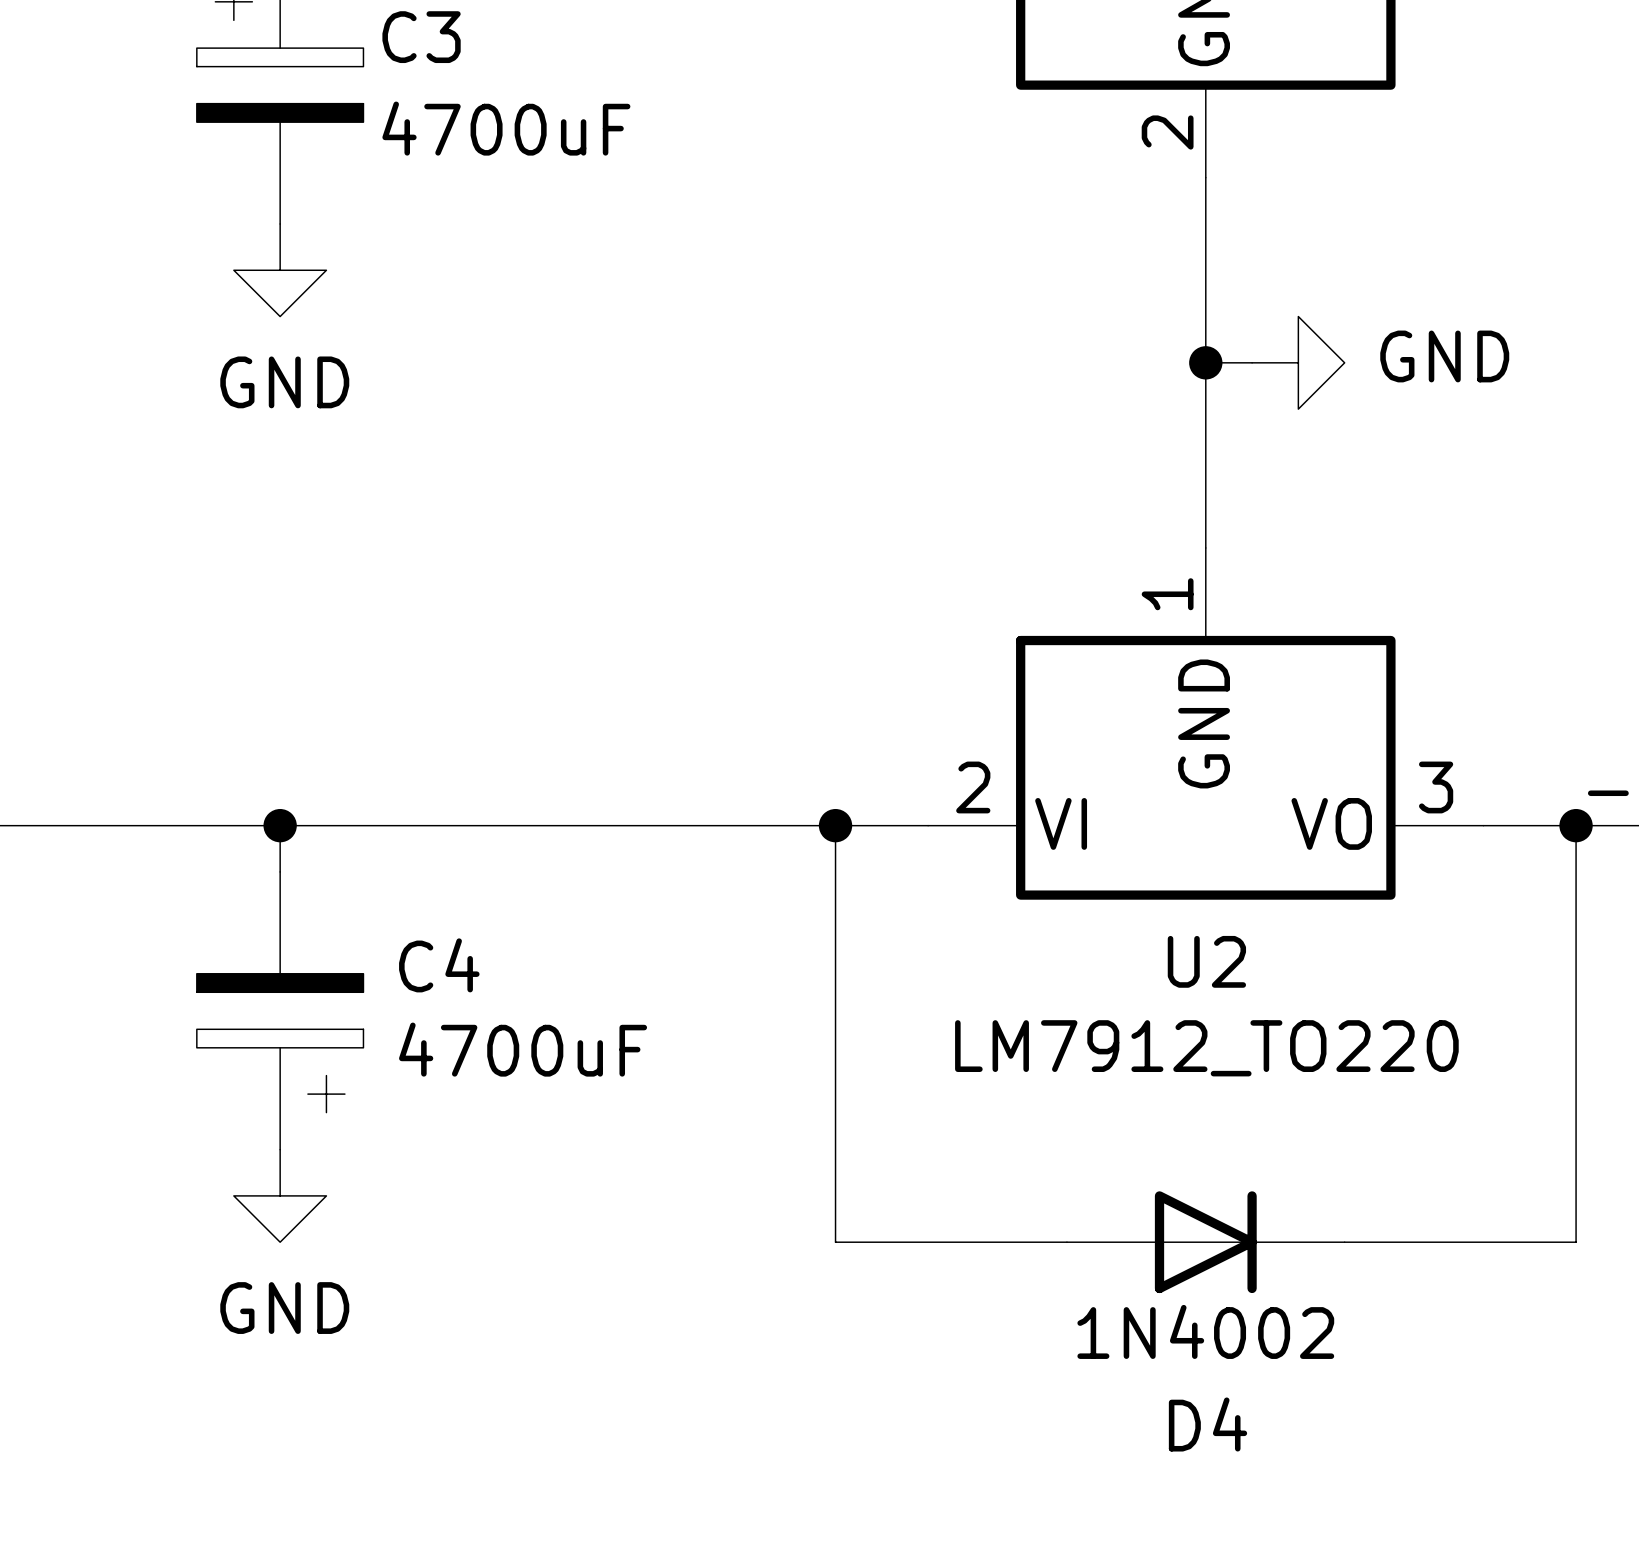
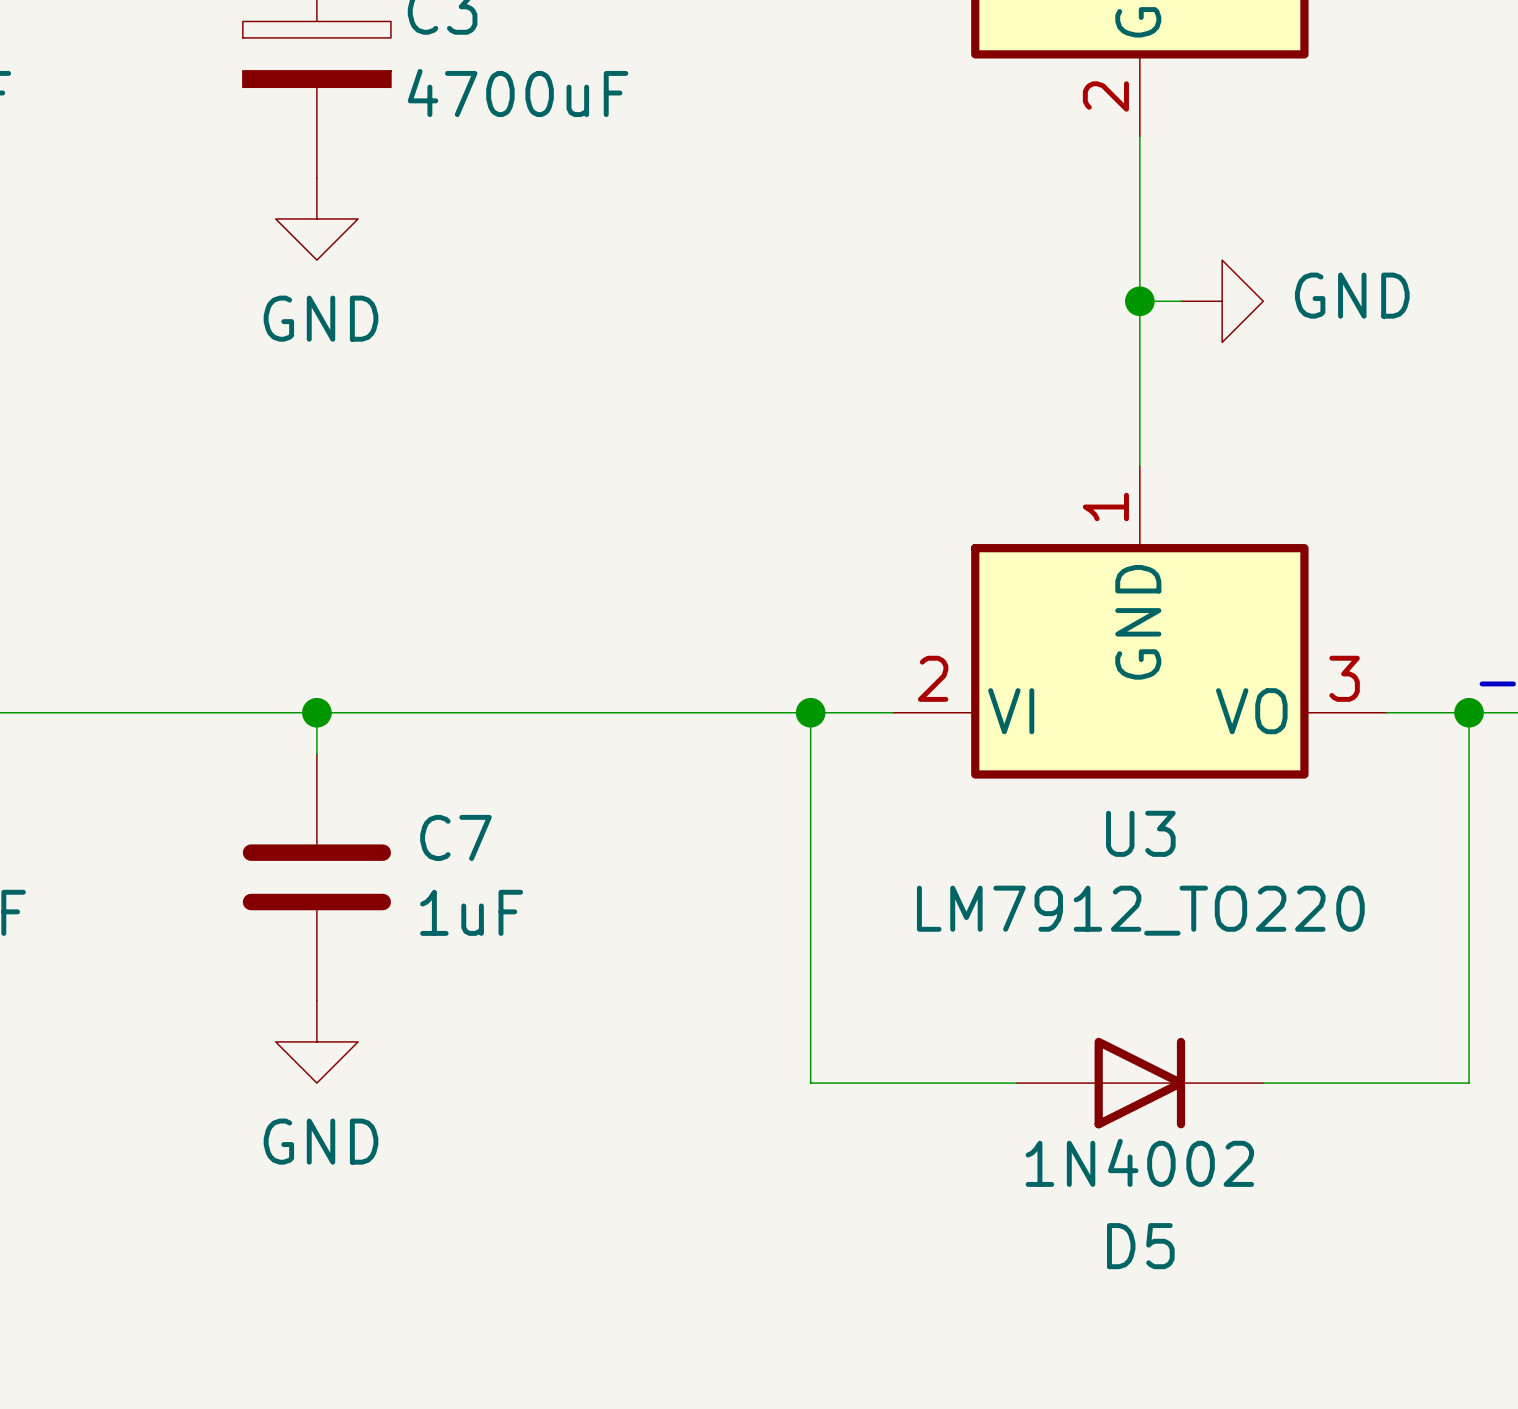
U2 name: U2 (1206, 961) -> U3 (1140, 833)
C4: 4700uF (280, 1010) -> none
C7: none -> 1uF (316, 877)
D4 name: D4 (1208, 1424) -> D5 (1140, 1246)

